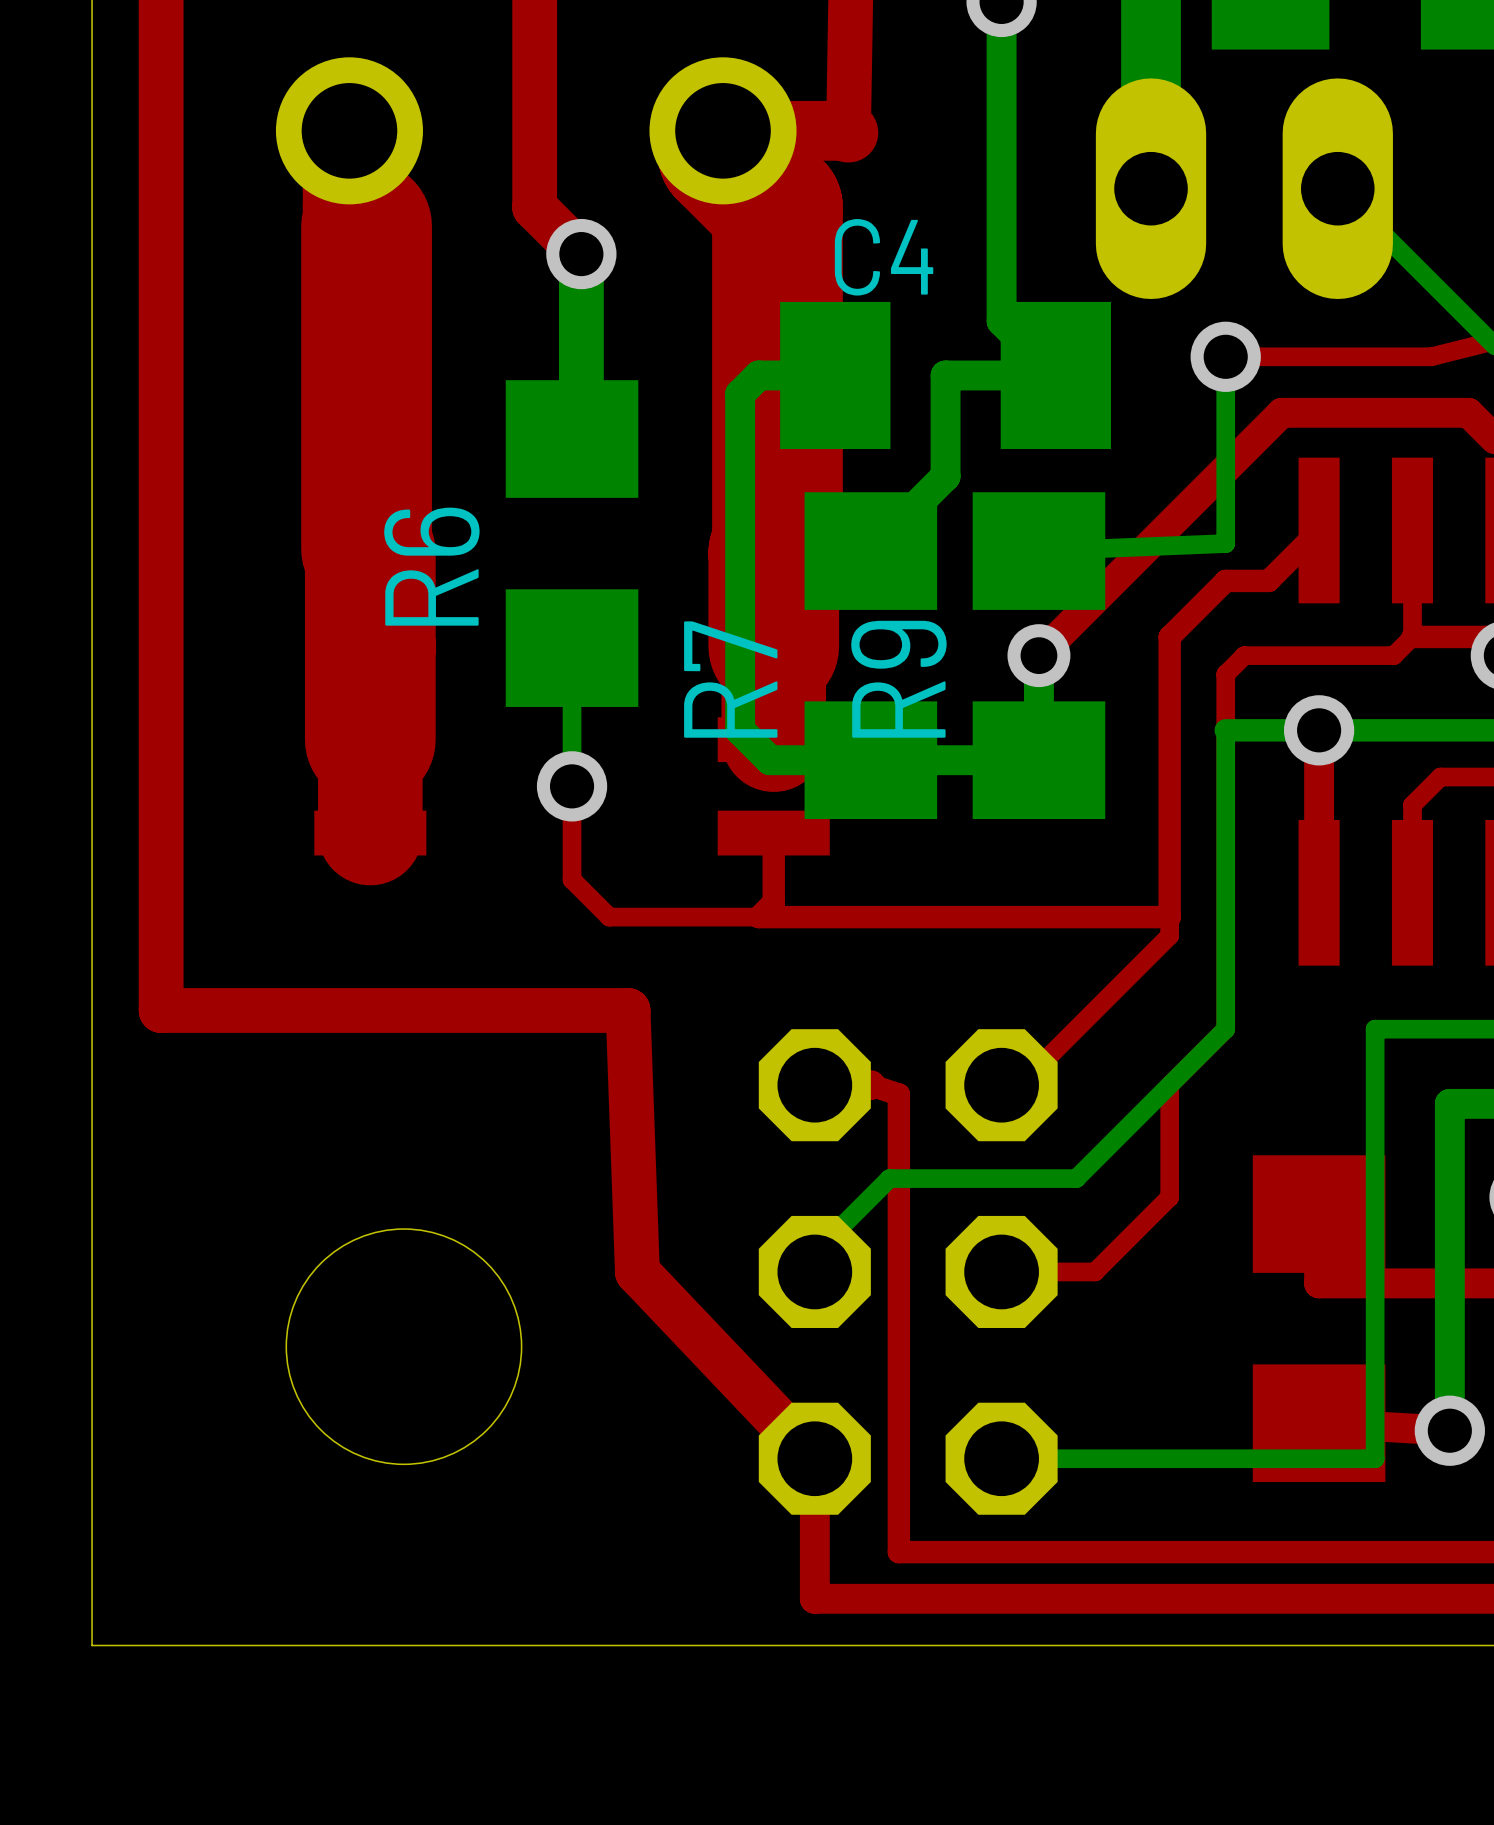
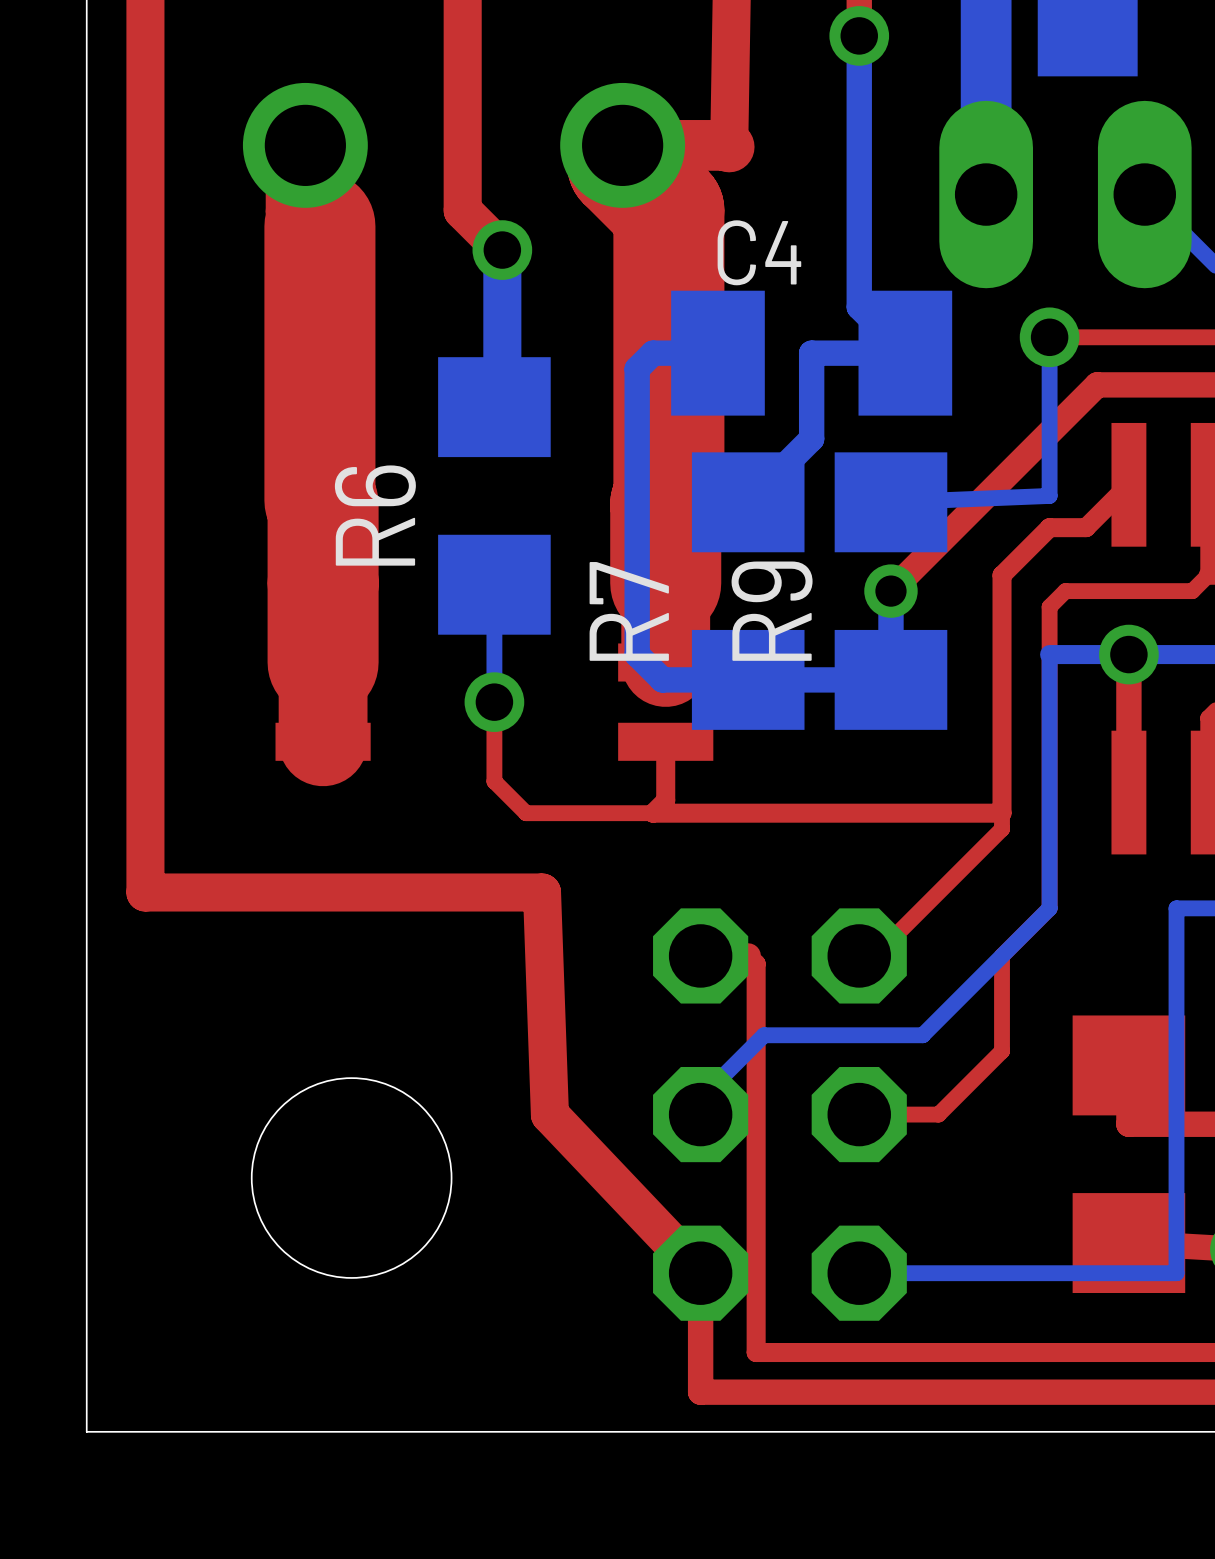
top track: (870, 1085) (898, 1094) (898, 1552) -> (748, 955) (756, 963) (756, 1352) (772, 1352)

